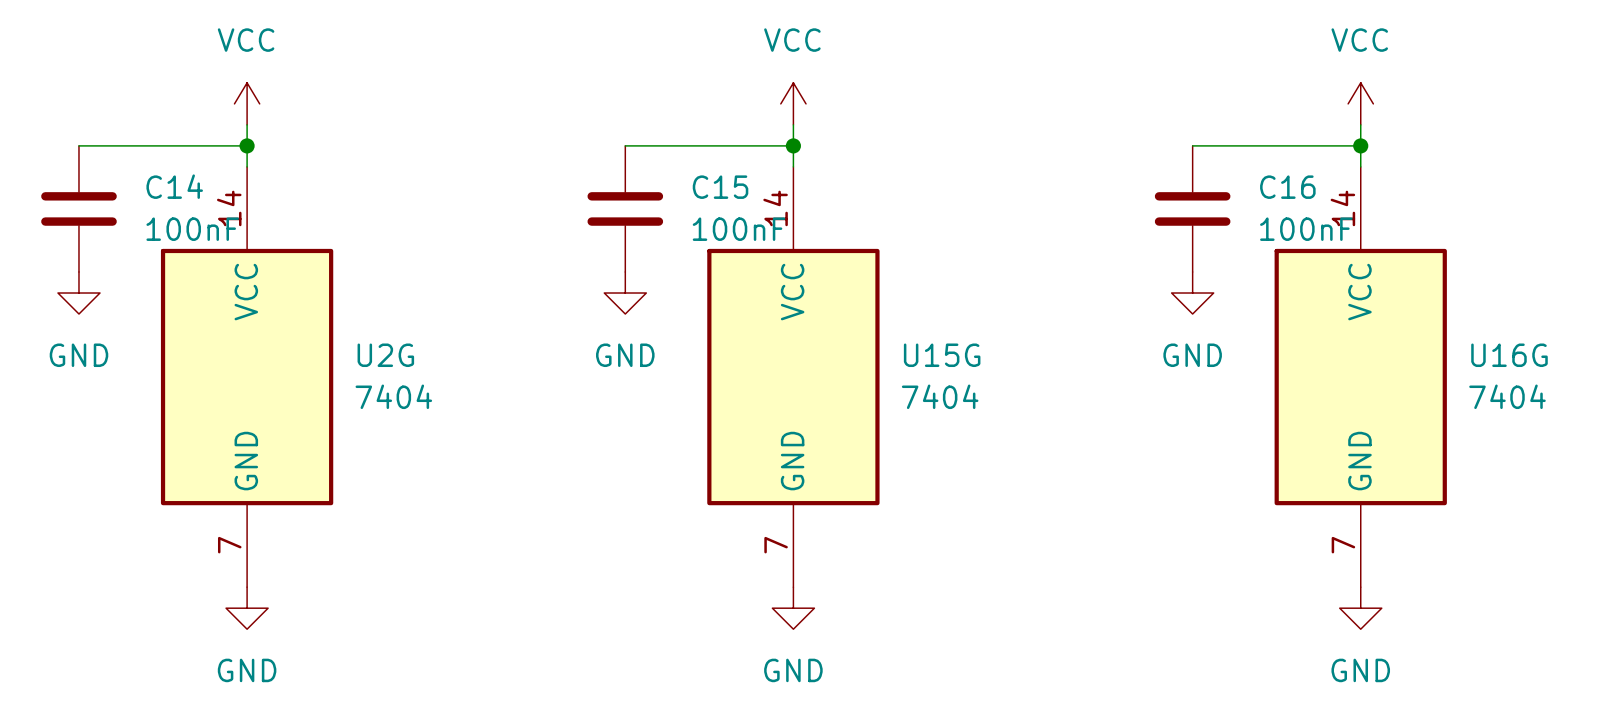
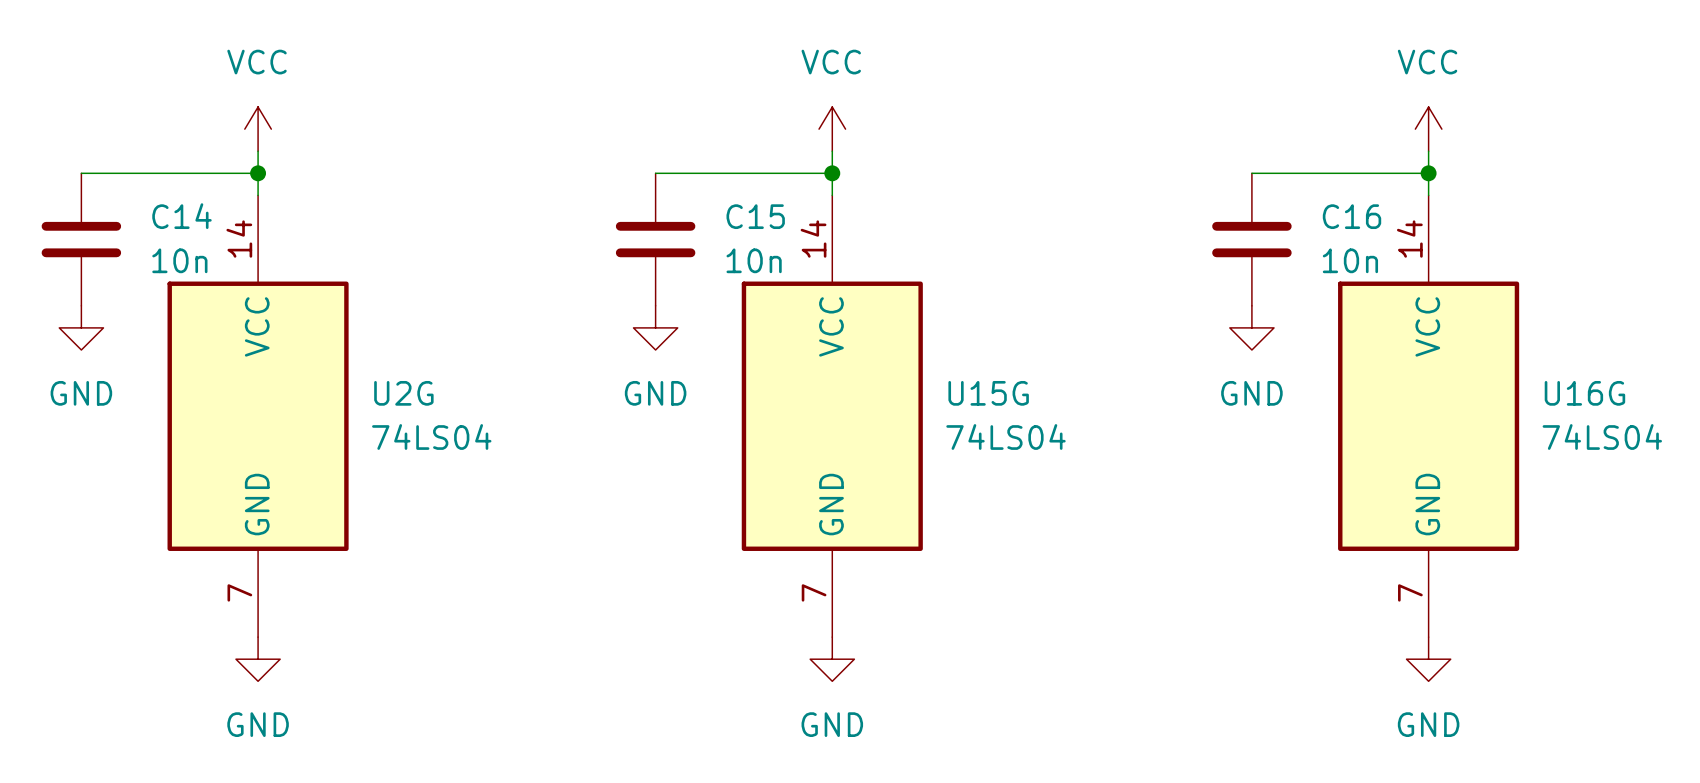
C14 value: 100nF (192, 229) -> 10n (179, 260)
C15 value: 100nF (739, 229) -> 10n (754, 260)
C16 value: 100nF (1306, 229) -> 10n (1350, 260)
U2G value: 7404 (393, 396) -> 74LS04 (431, 436)
U15G value: 7404 (940, 396) -> 74LS04 (1005, 436)
U16G value: 7404 (1507, 396) -> 74LS04 (1602, 436)

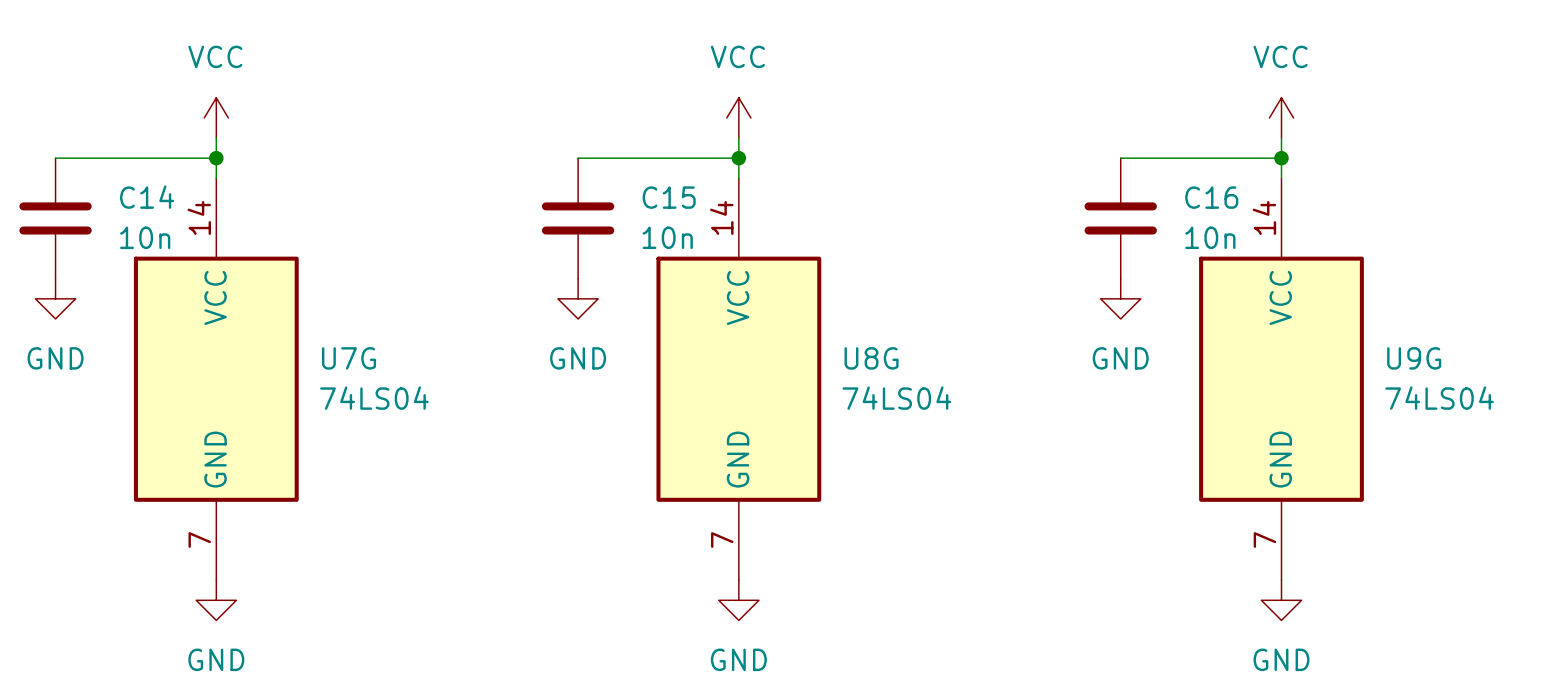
U2G name: U2G (403, 393) -> U7G (349, 358)
U15G name: U15G (988, 393) -> U8G (871, 358)
U16G name: U16G (1584, 393) -> U9G (1414, 358)

